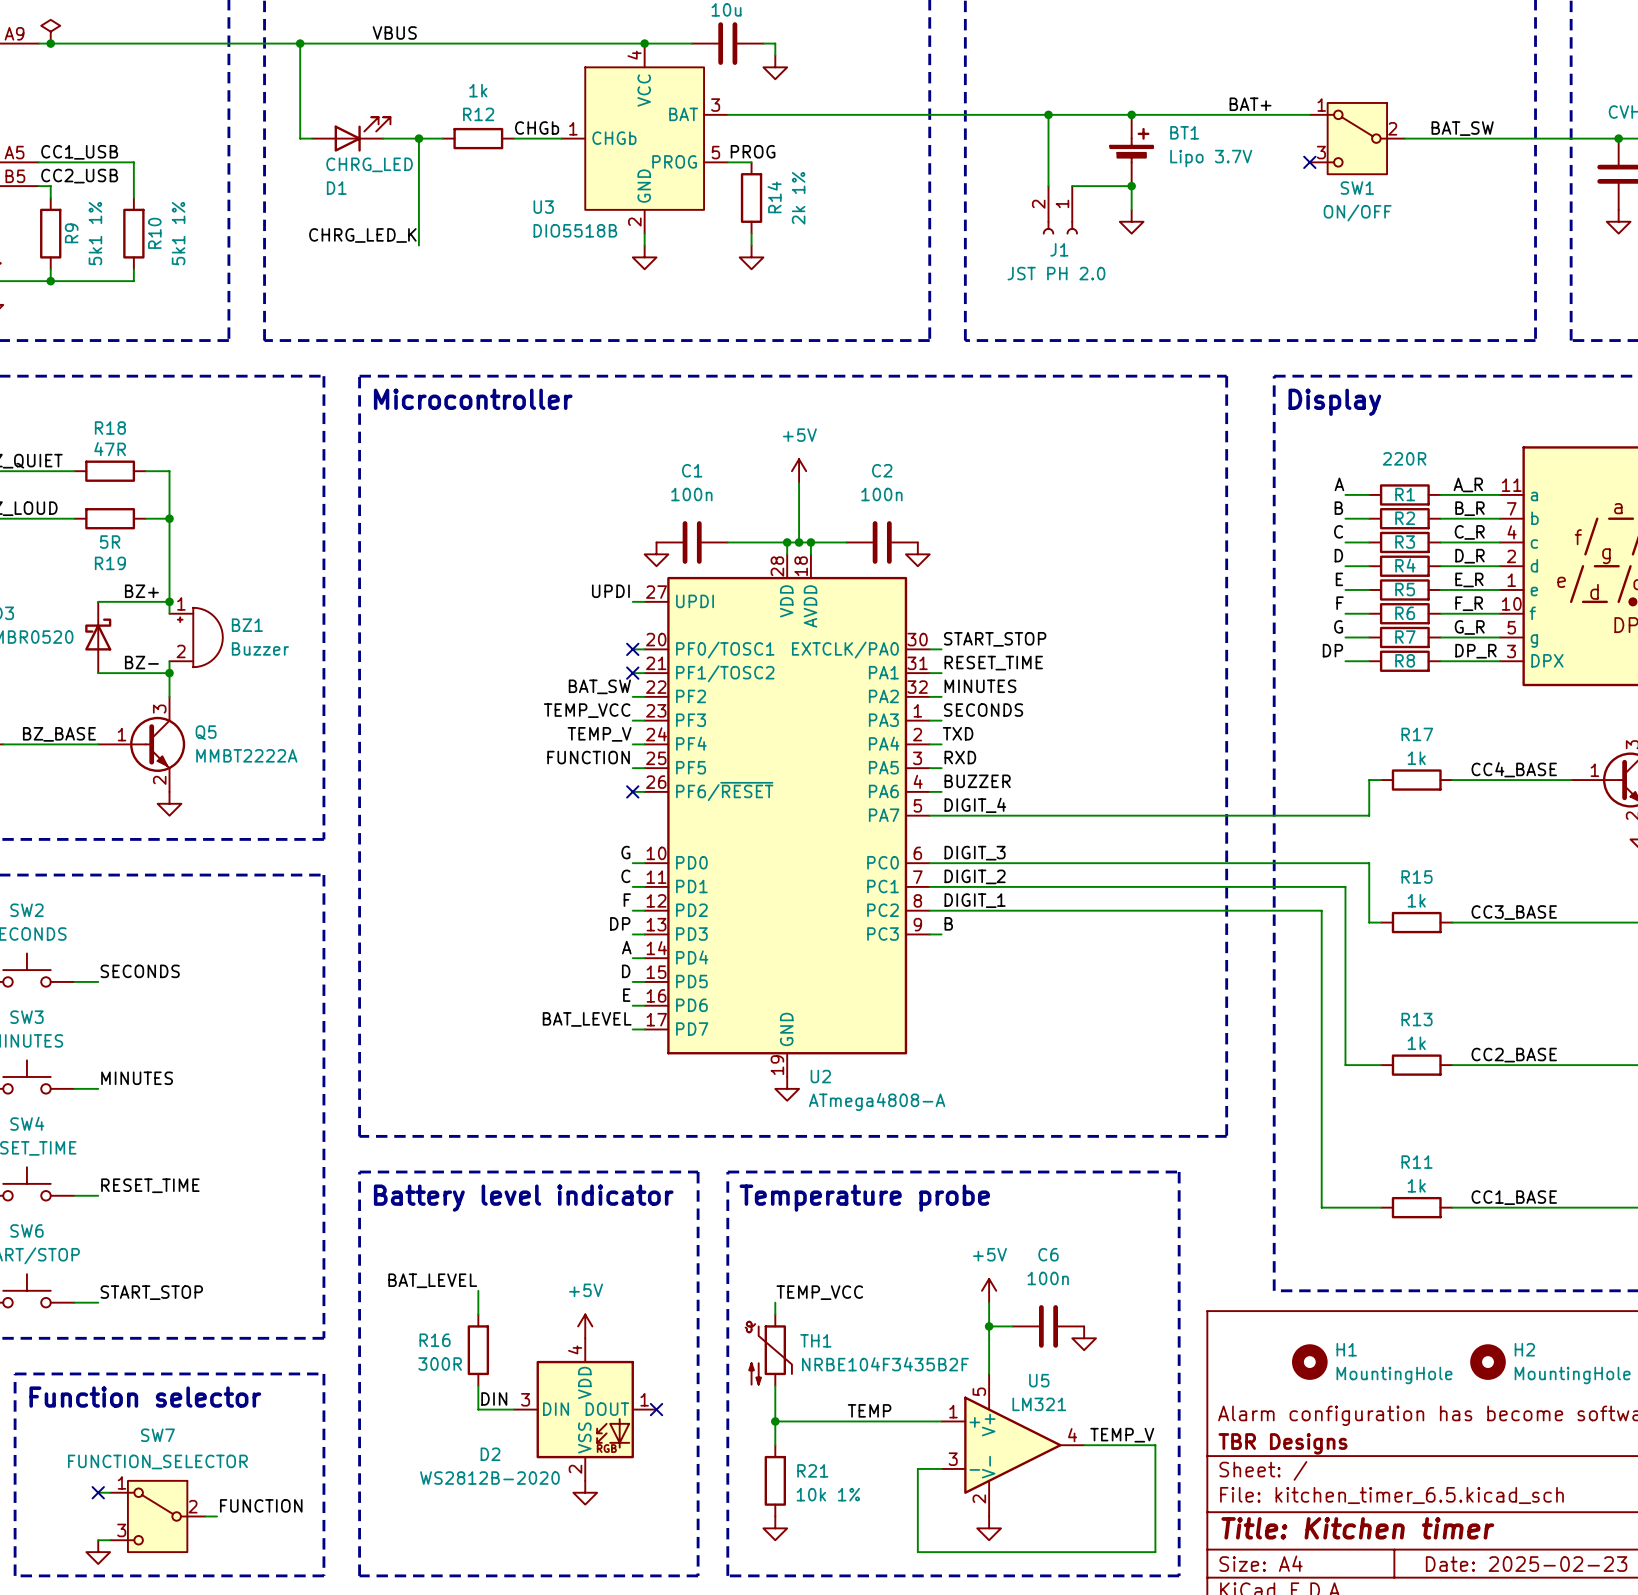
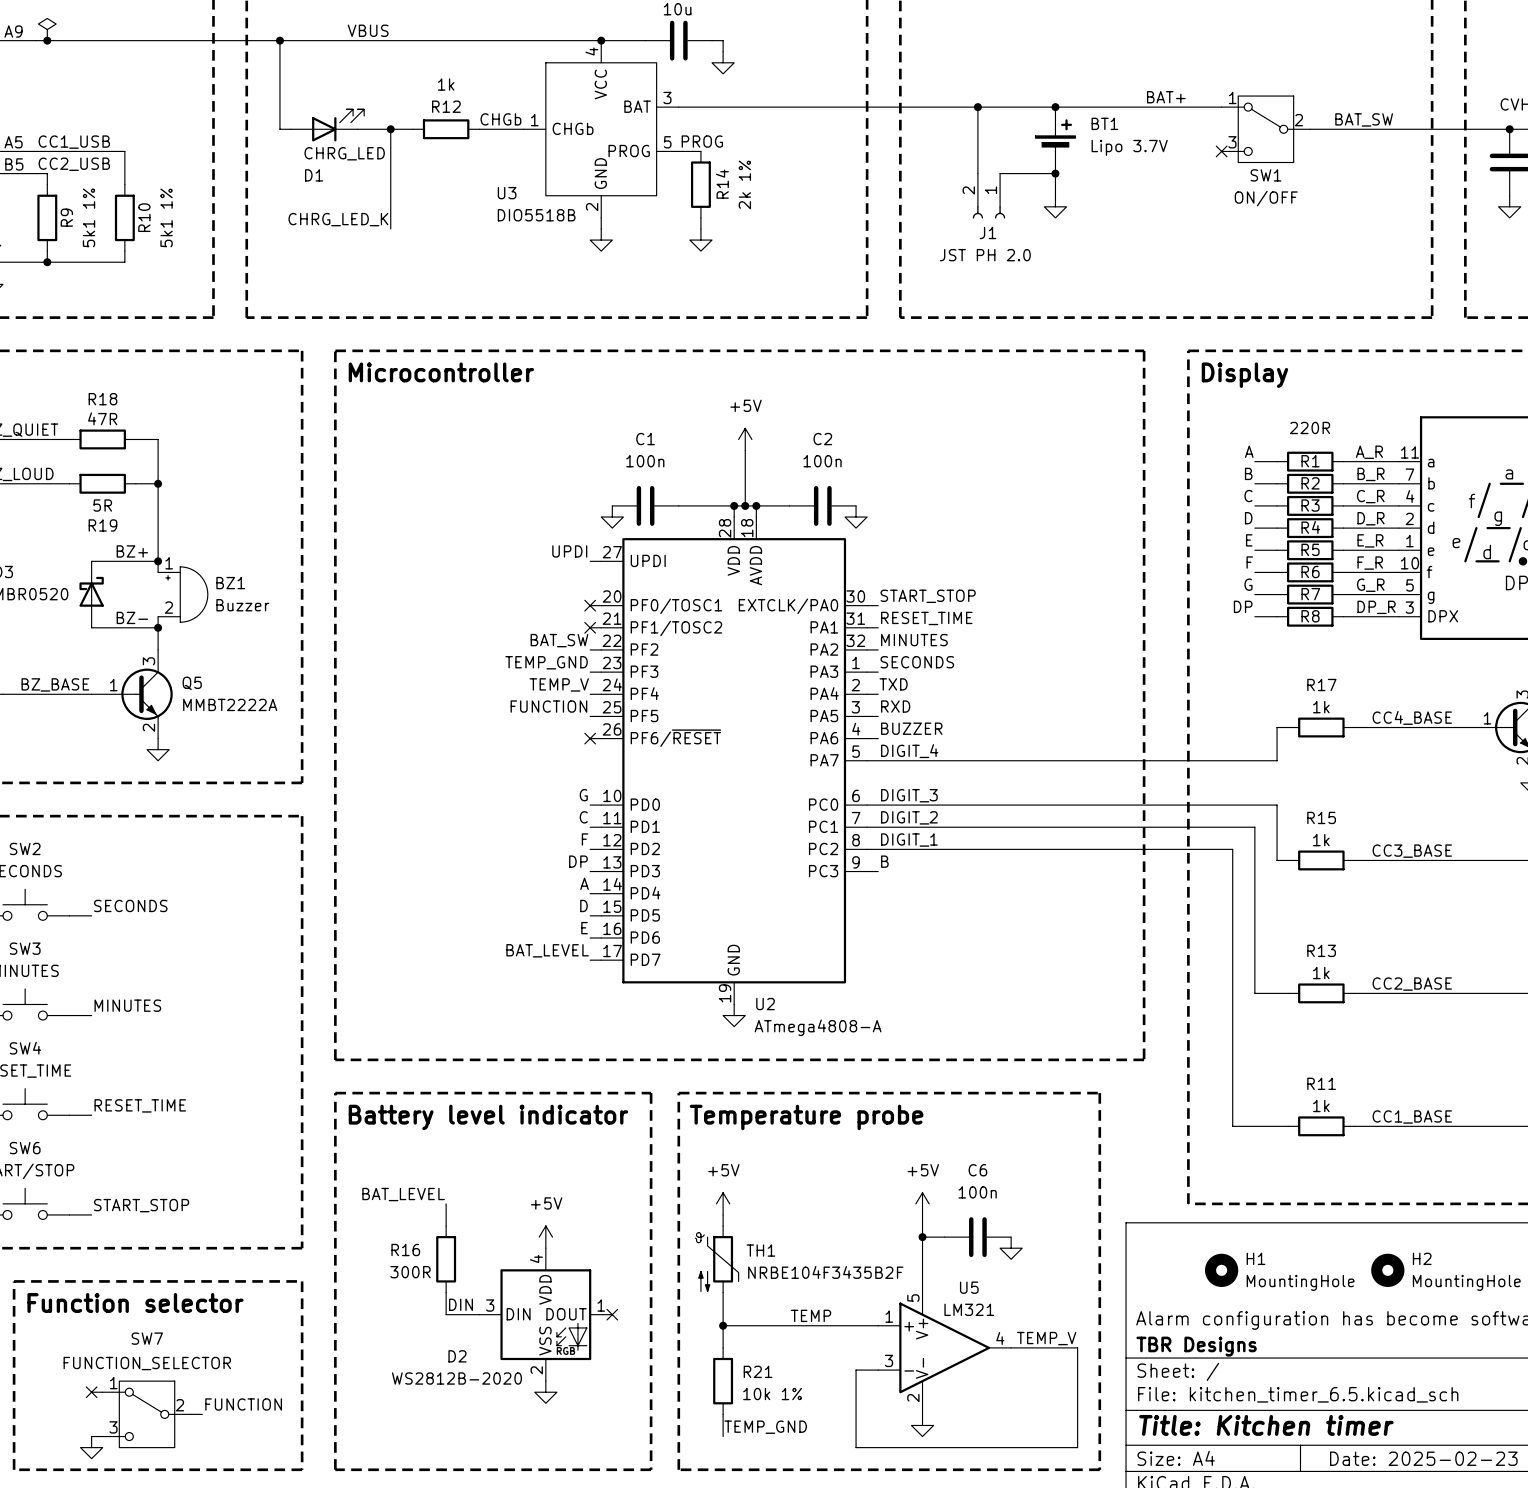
label: TEMP_VCC (587, 710) -> TEMP_GND (546, 662)
power symbol: none -> +5V (723, 1203)
label: TEMP_VCC (819, 1292) -> none
power symbol: (775, 1528) -> none
label: none -> TEMP_GND (765, 1427)

